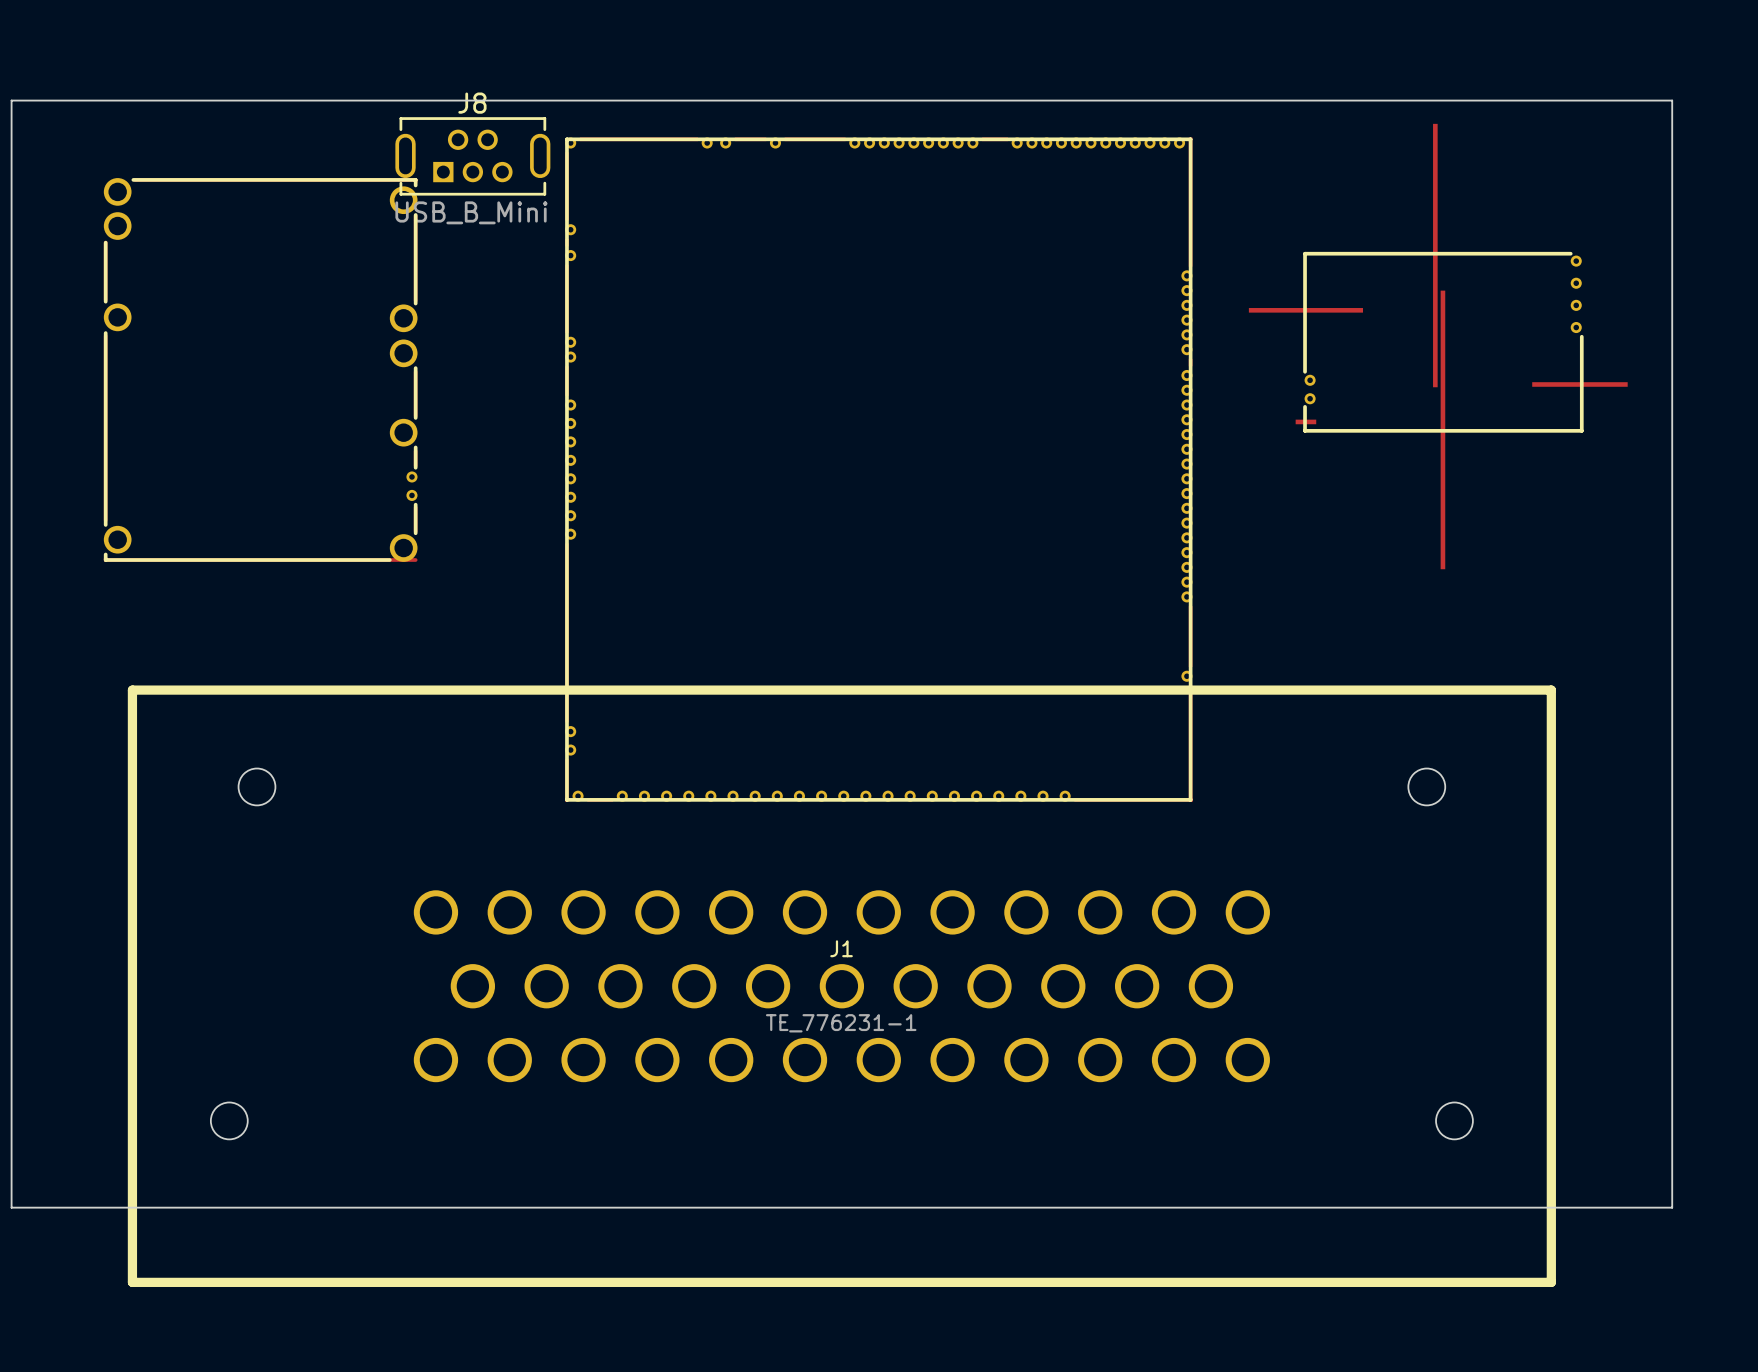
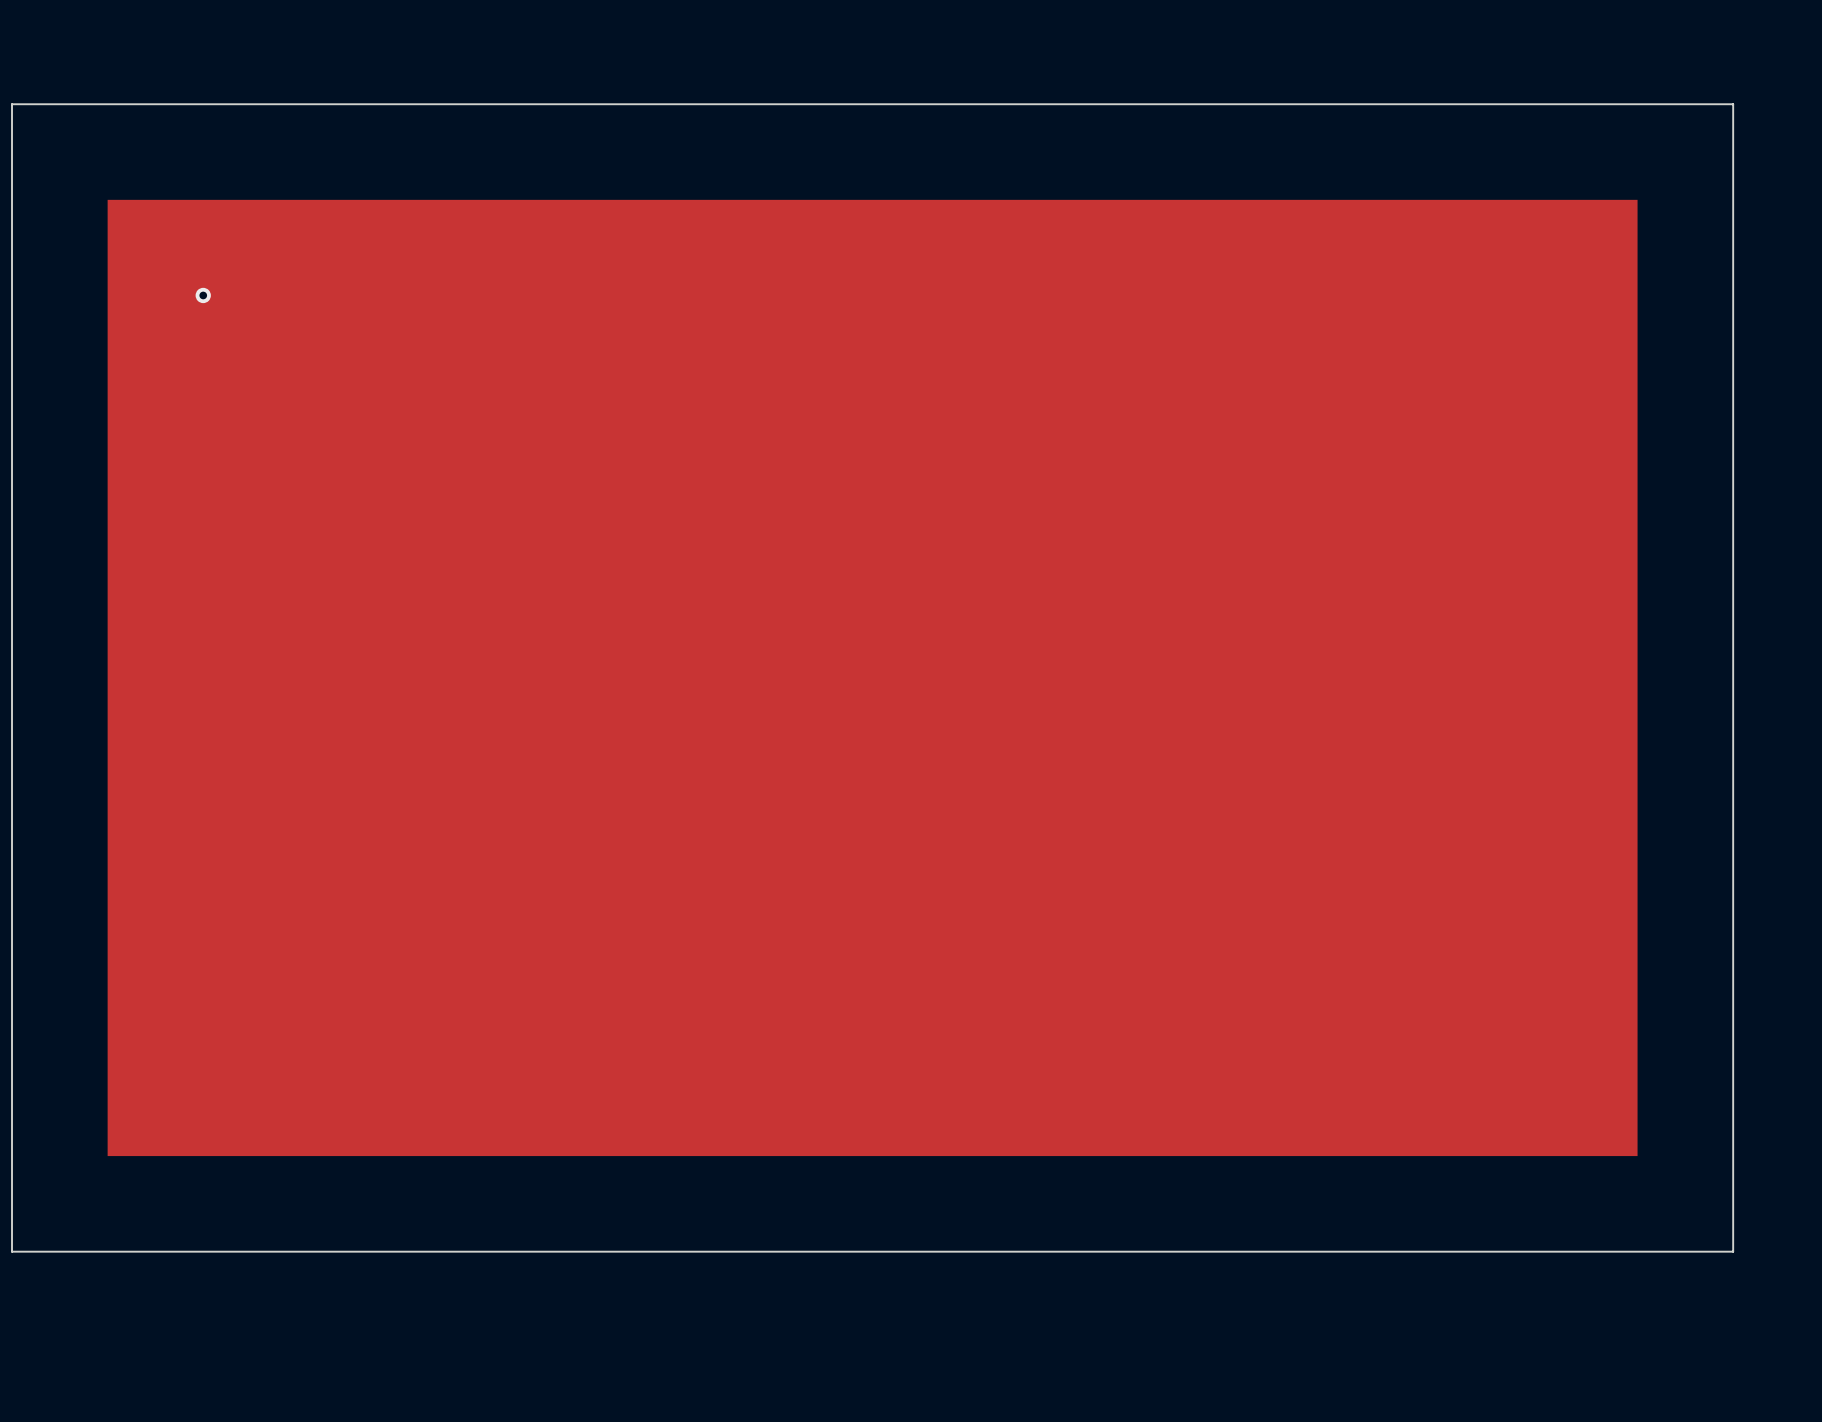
J8: USB_B_Mini (472, 156) -> none
drawing: none -> [107, 199, 1638, 1157]
via: none -> (203, 295)
part: (1438, 346) -> none
part: (260, 369) -> none
part: (878, 469) -> none
J1: TE_776231-1 (841, 986) -> none

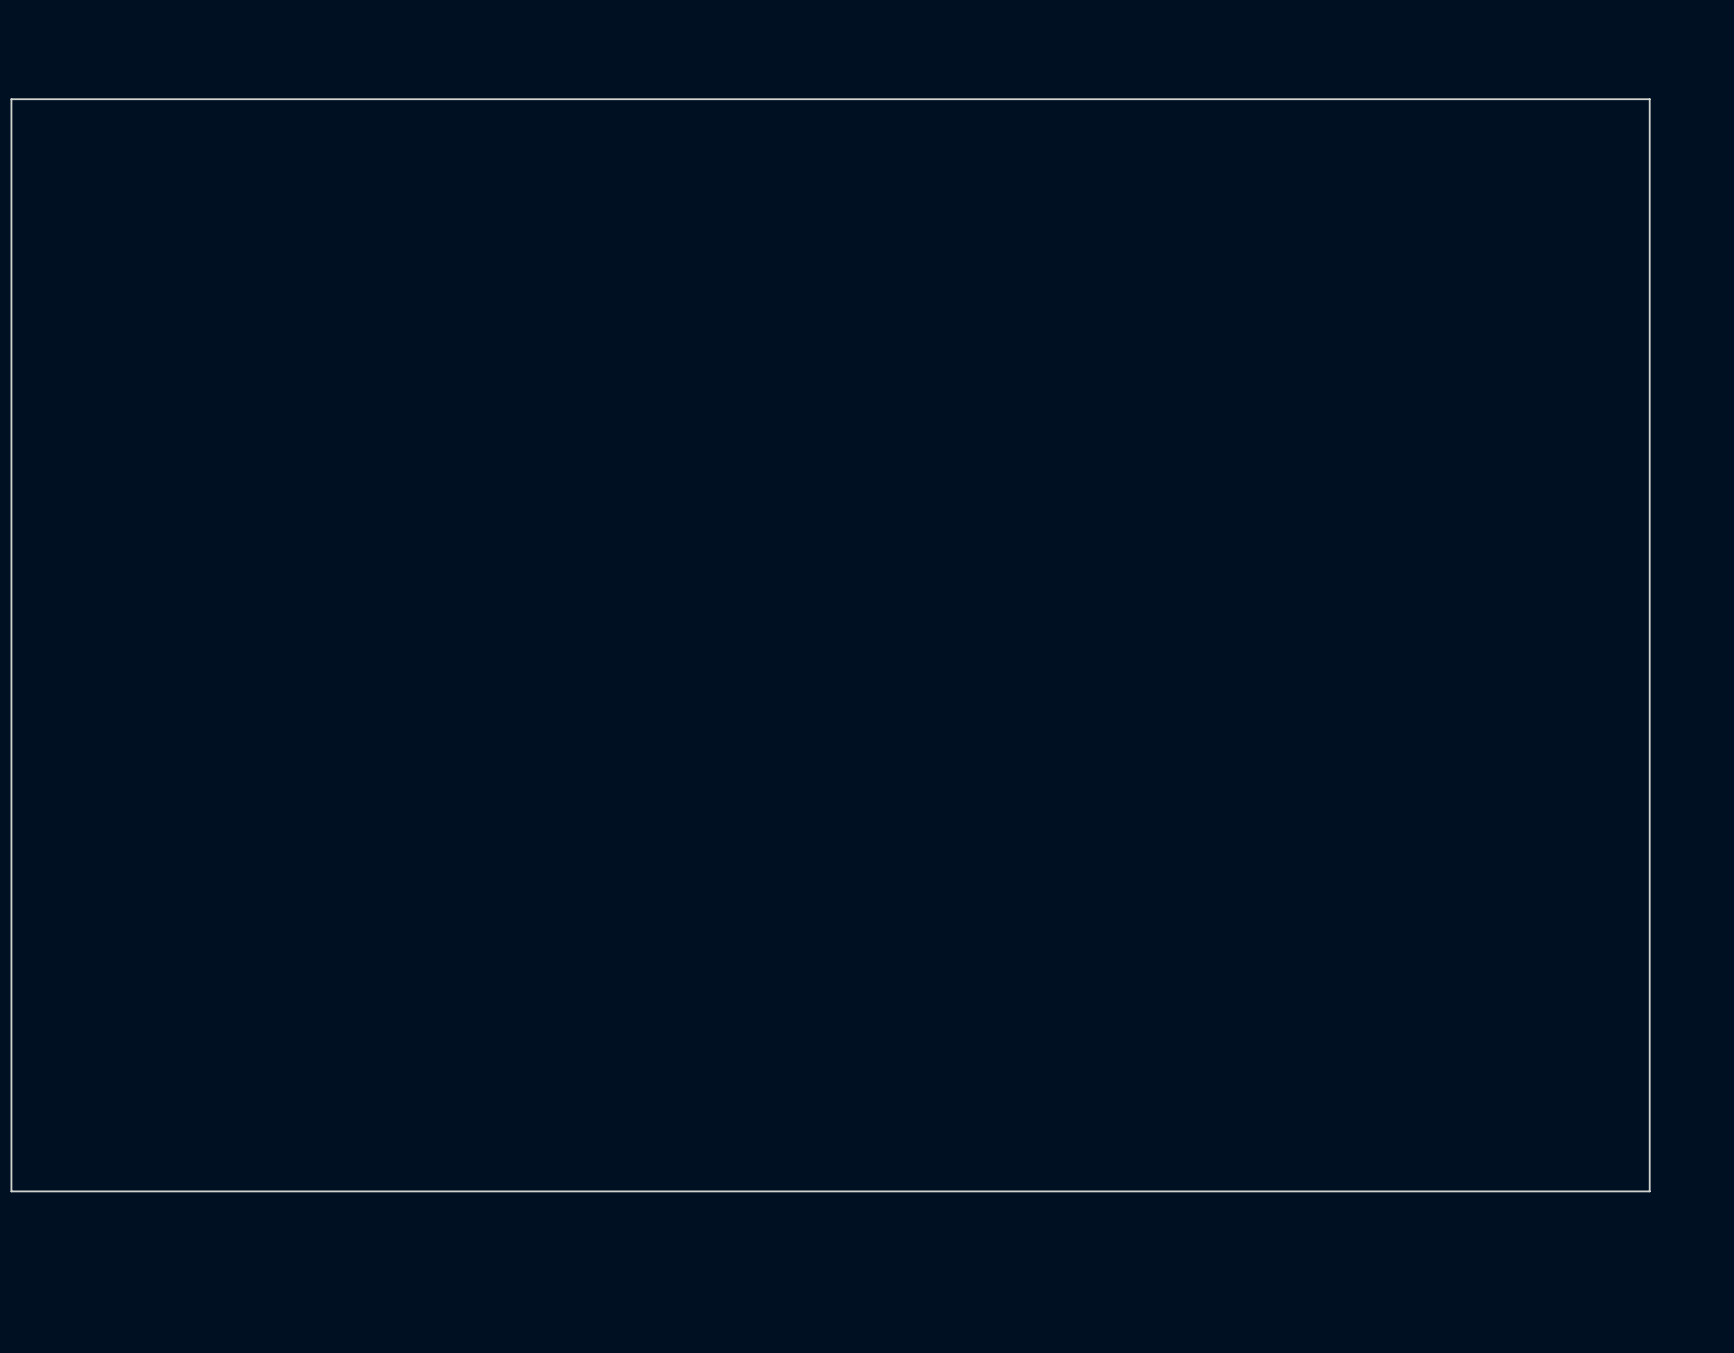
drawing: [107, 199, 1638, 1157] -> none
via: (203, 295) -> none

